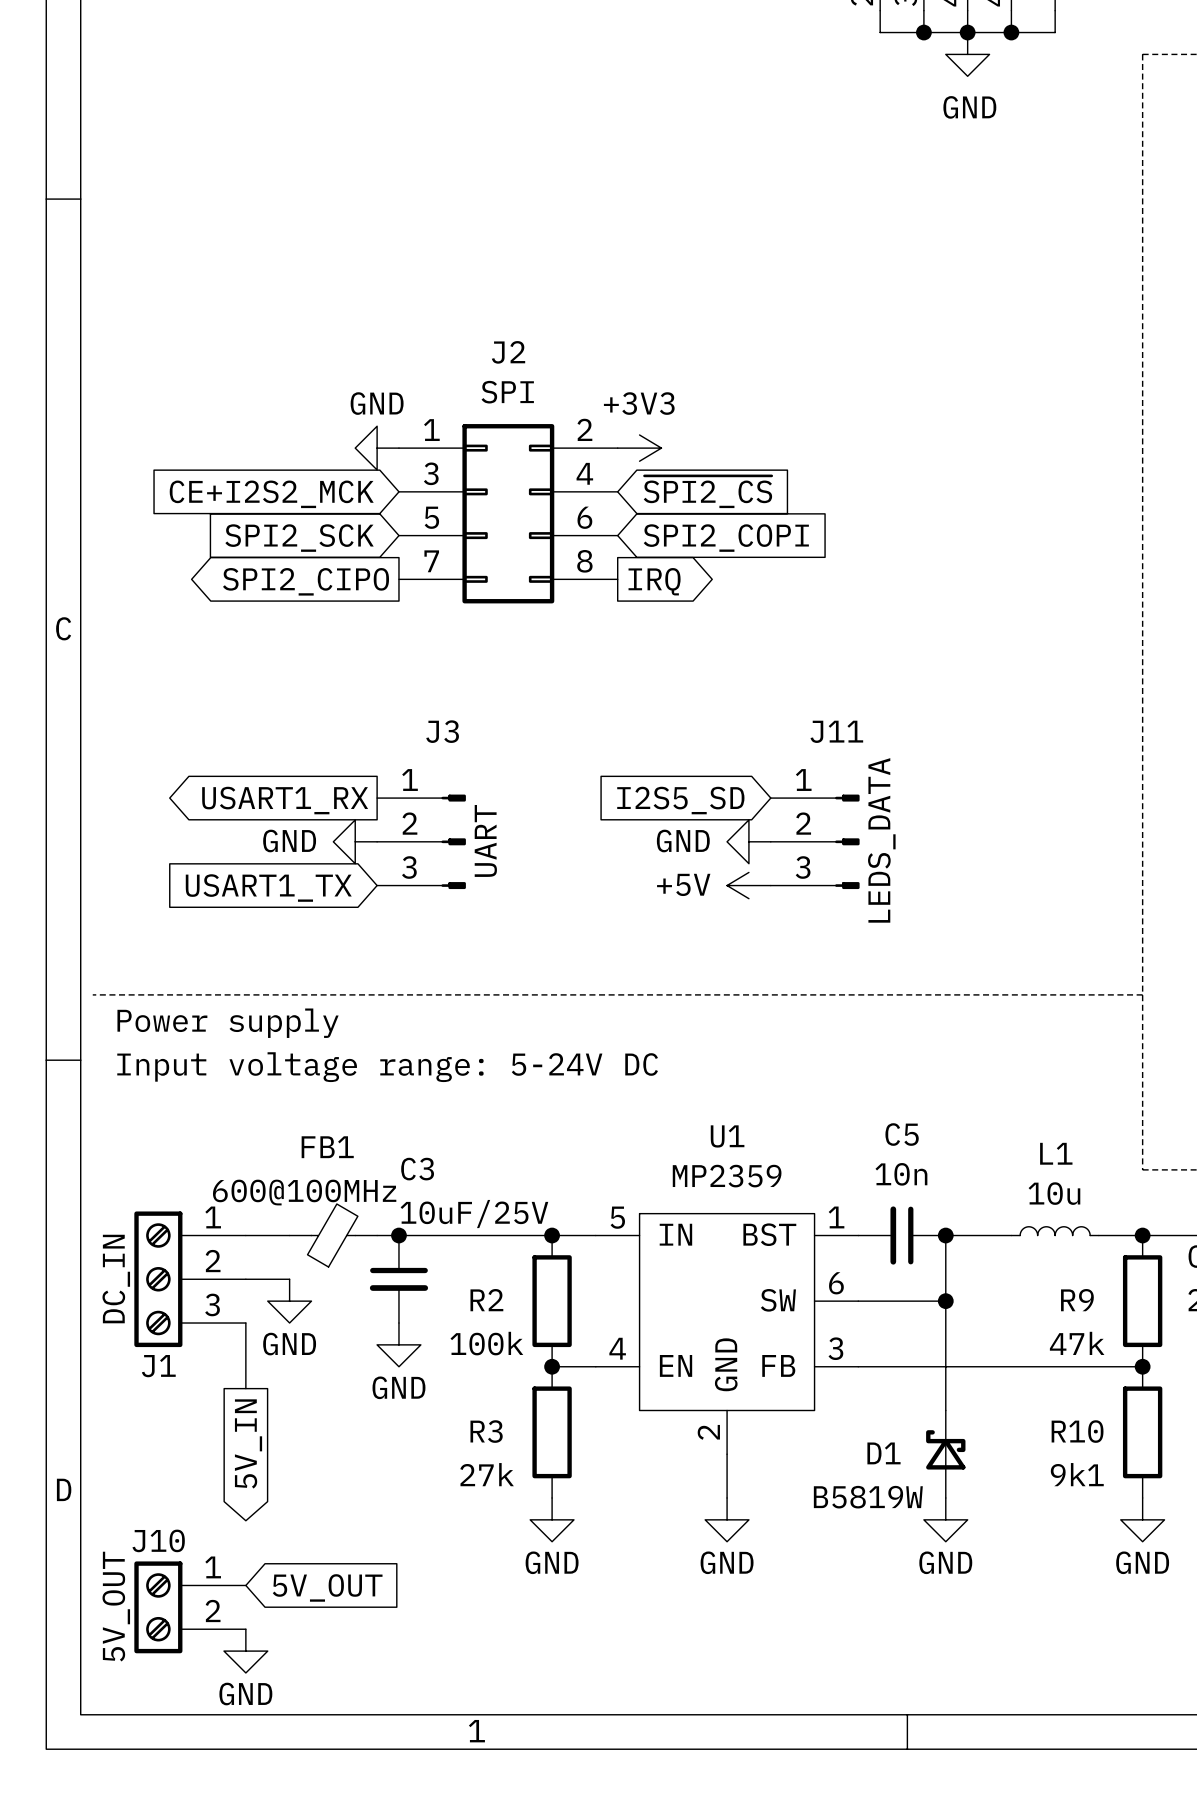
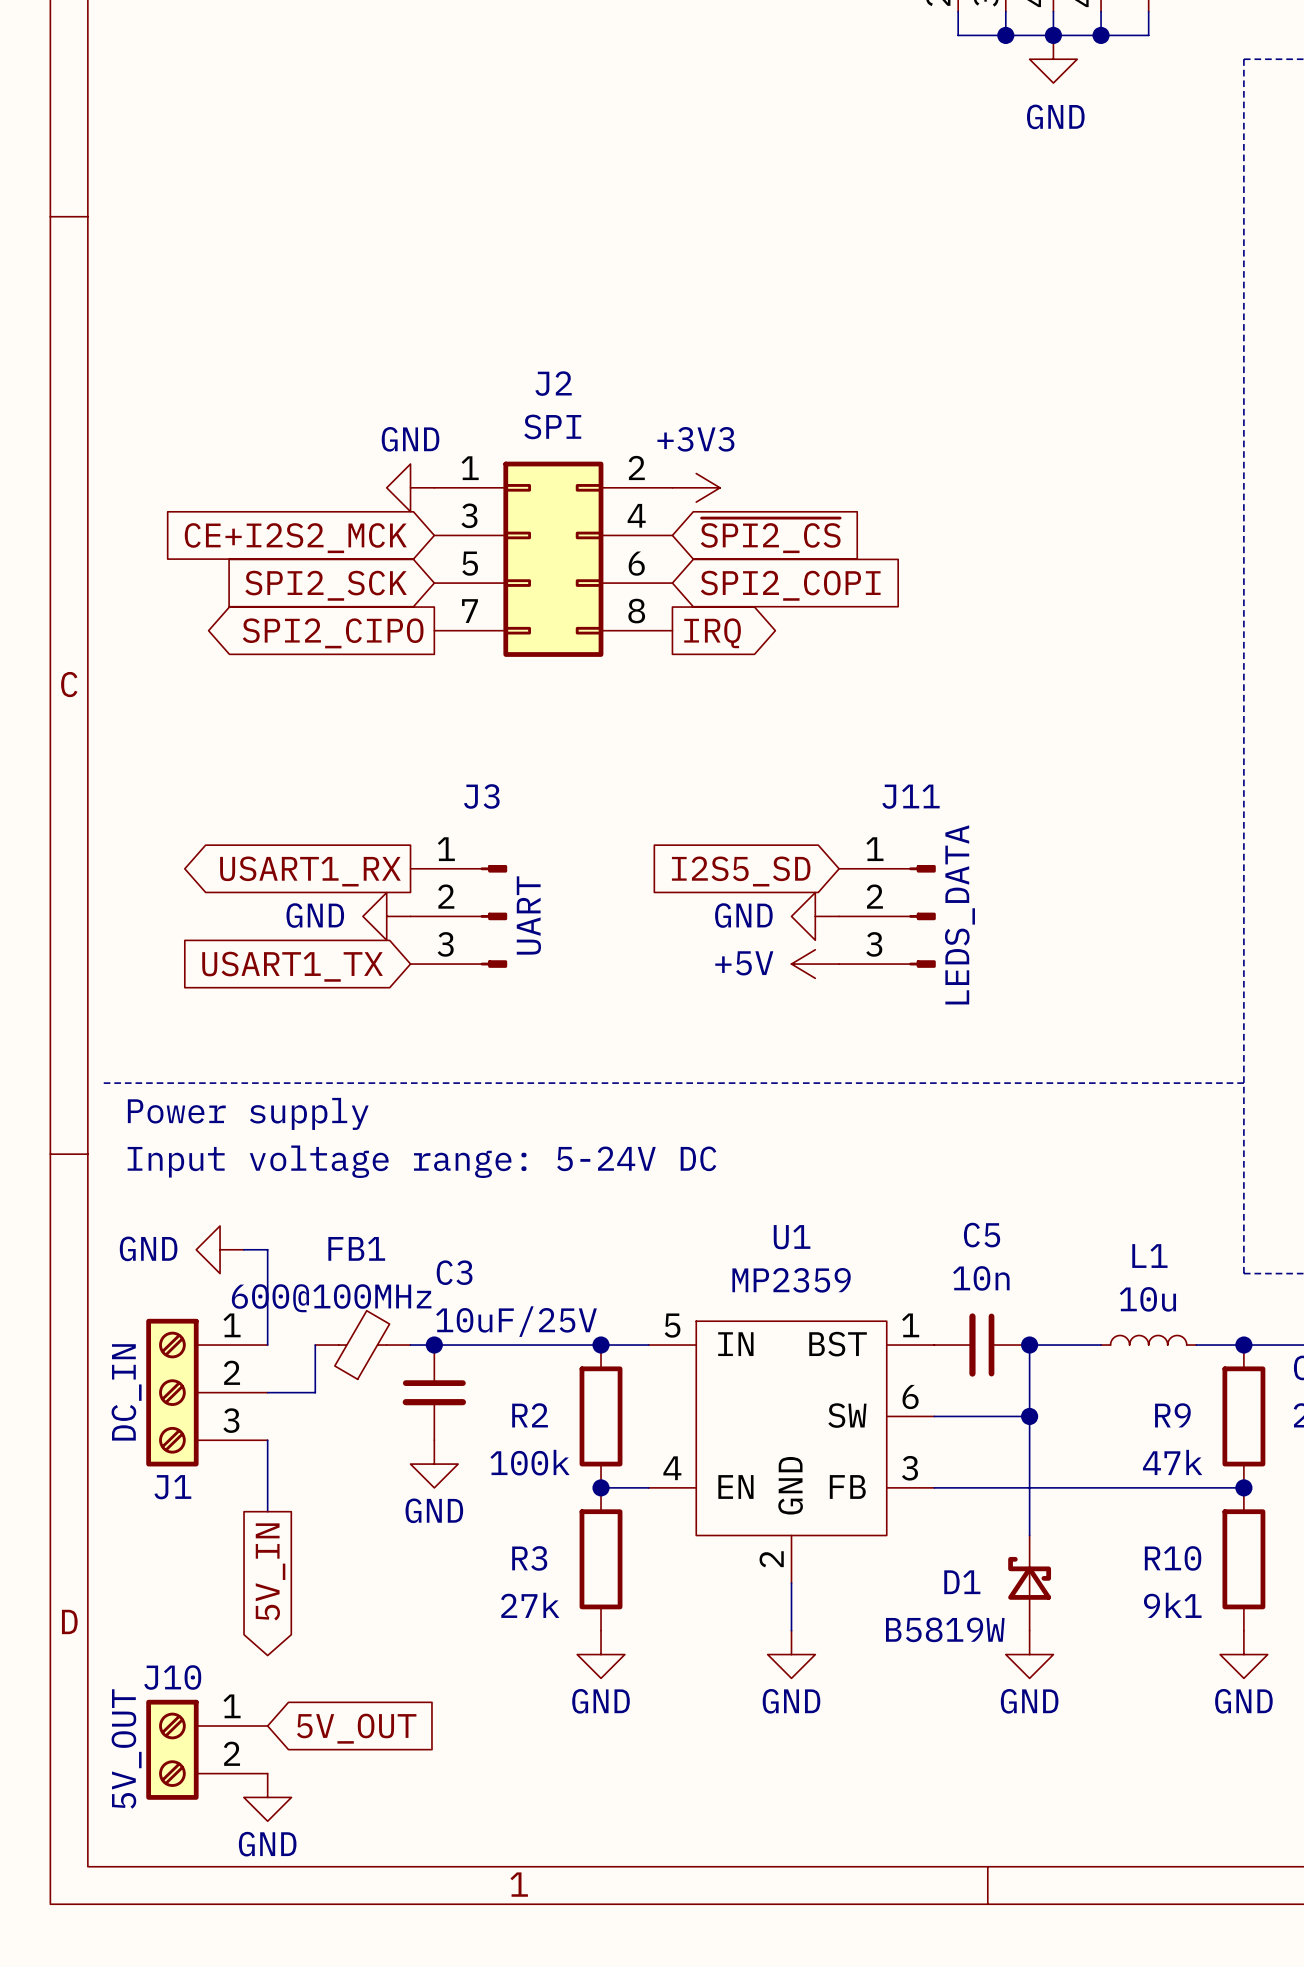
wire: none -> (243, 1249) (267, 1249) (267, 1345)
wire: (245, 1235) (289, 1235) -> (315, 1392) (315, 1345)
power symbol rotation: 0° (289, 1301) -> 90° clockwise (220, 1249)
power symbol position: GND (289, 1301) -> GND (220, 1249)

